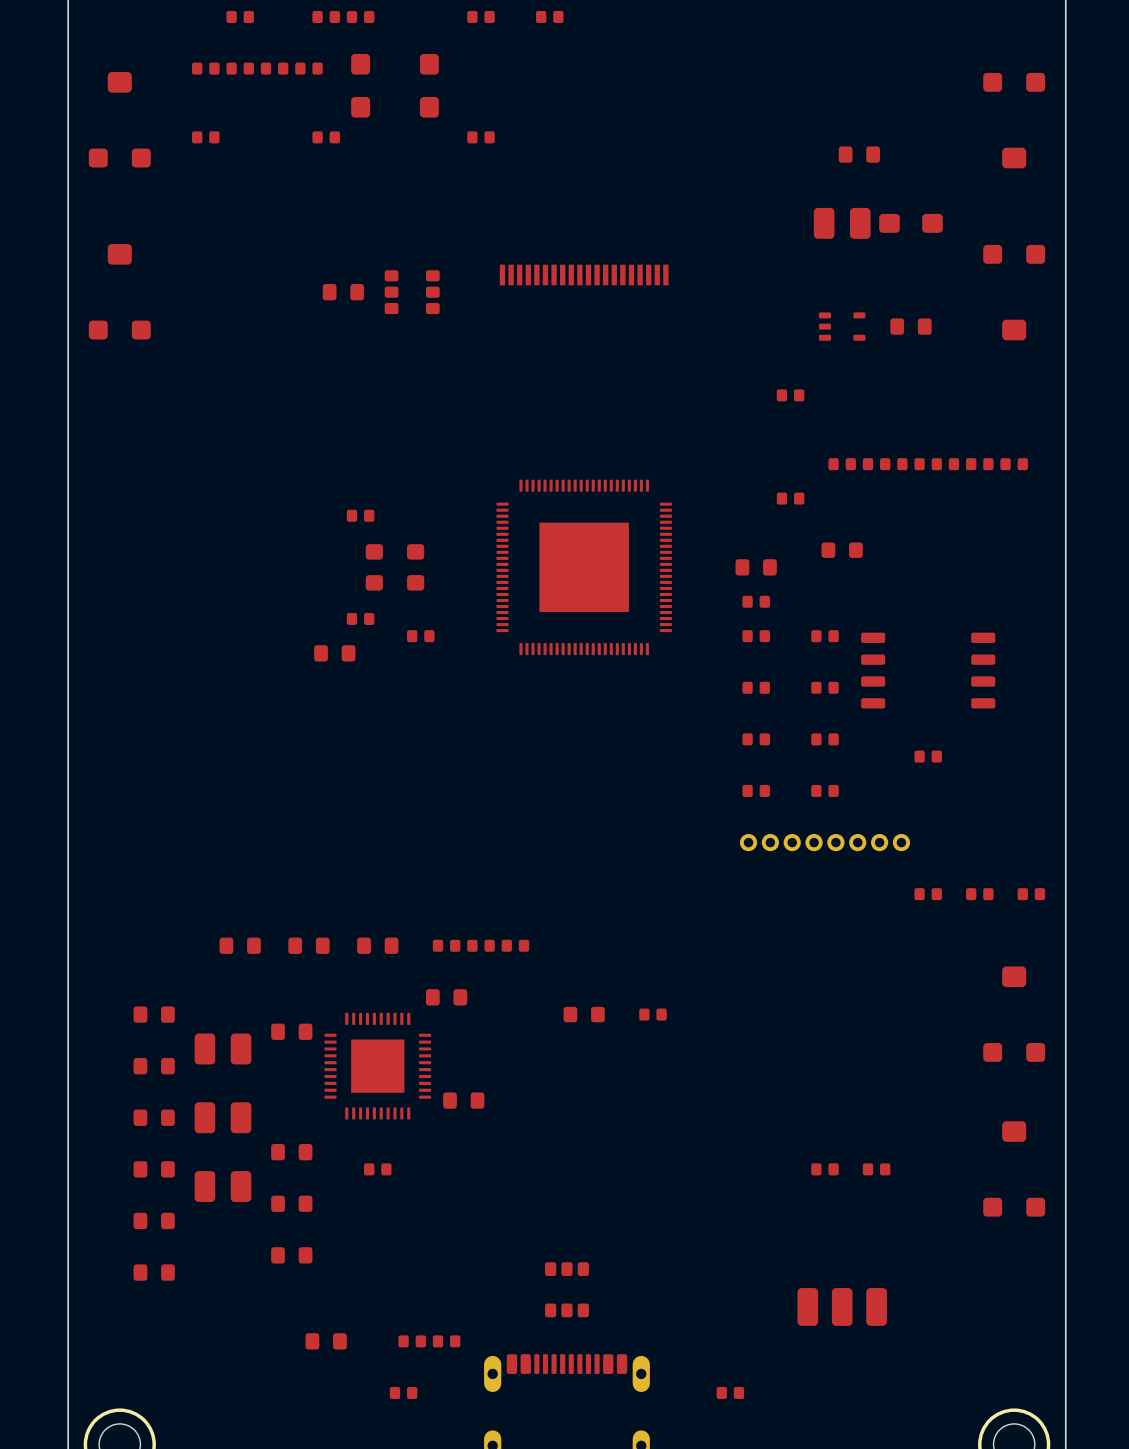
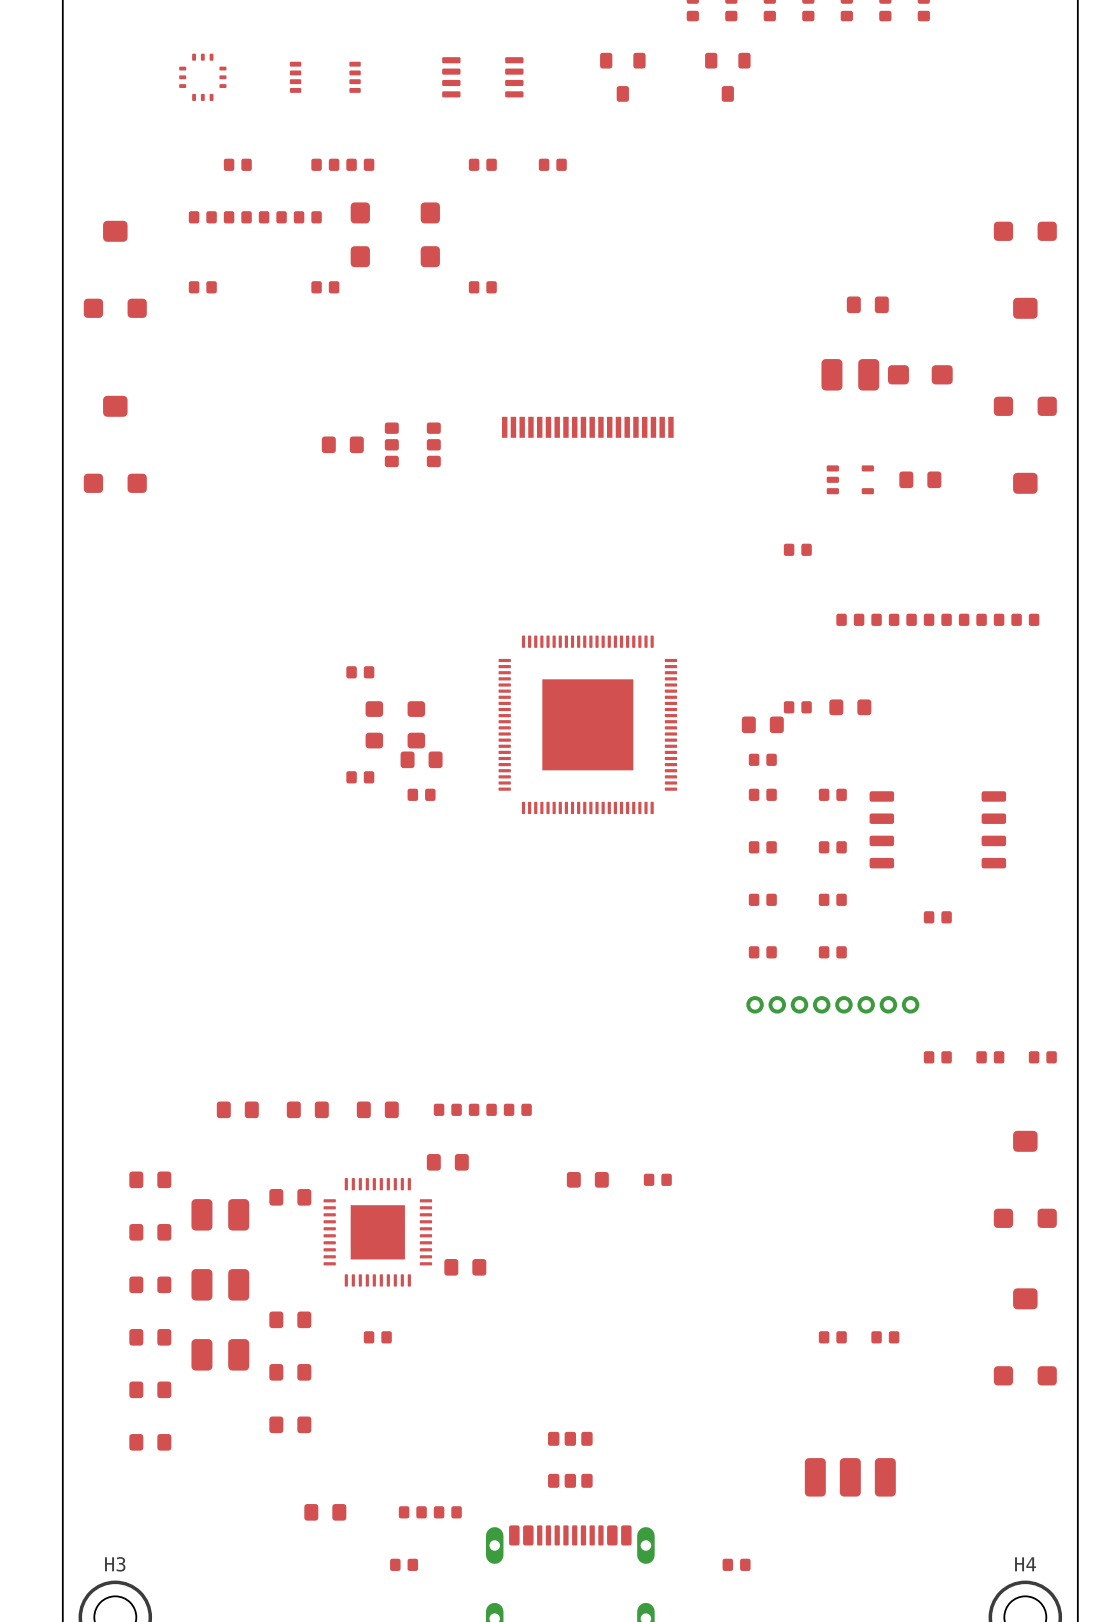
part position: (790, 498) -> (797, 707)
part position: (334, 653) -> (421, 759)
H3 name: none -> H3 (115, 1564)
H4 name: none -> H4 (1025, 1564)

